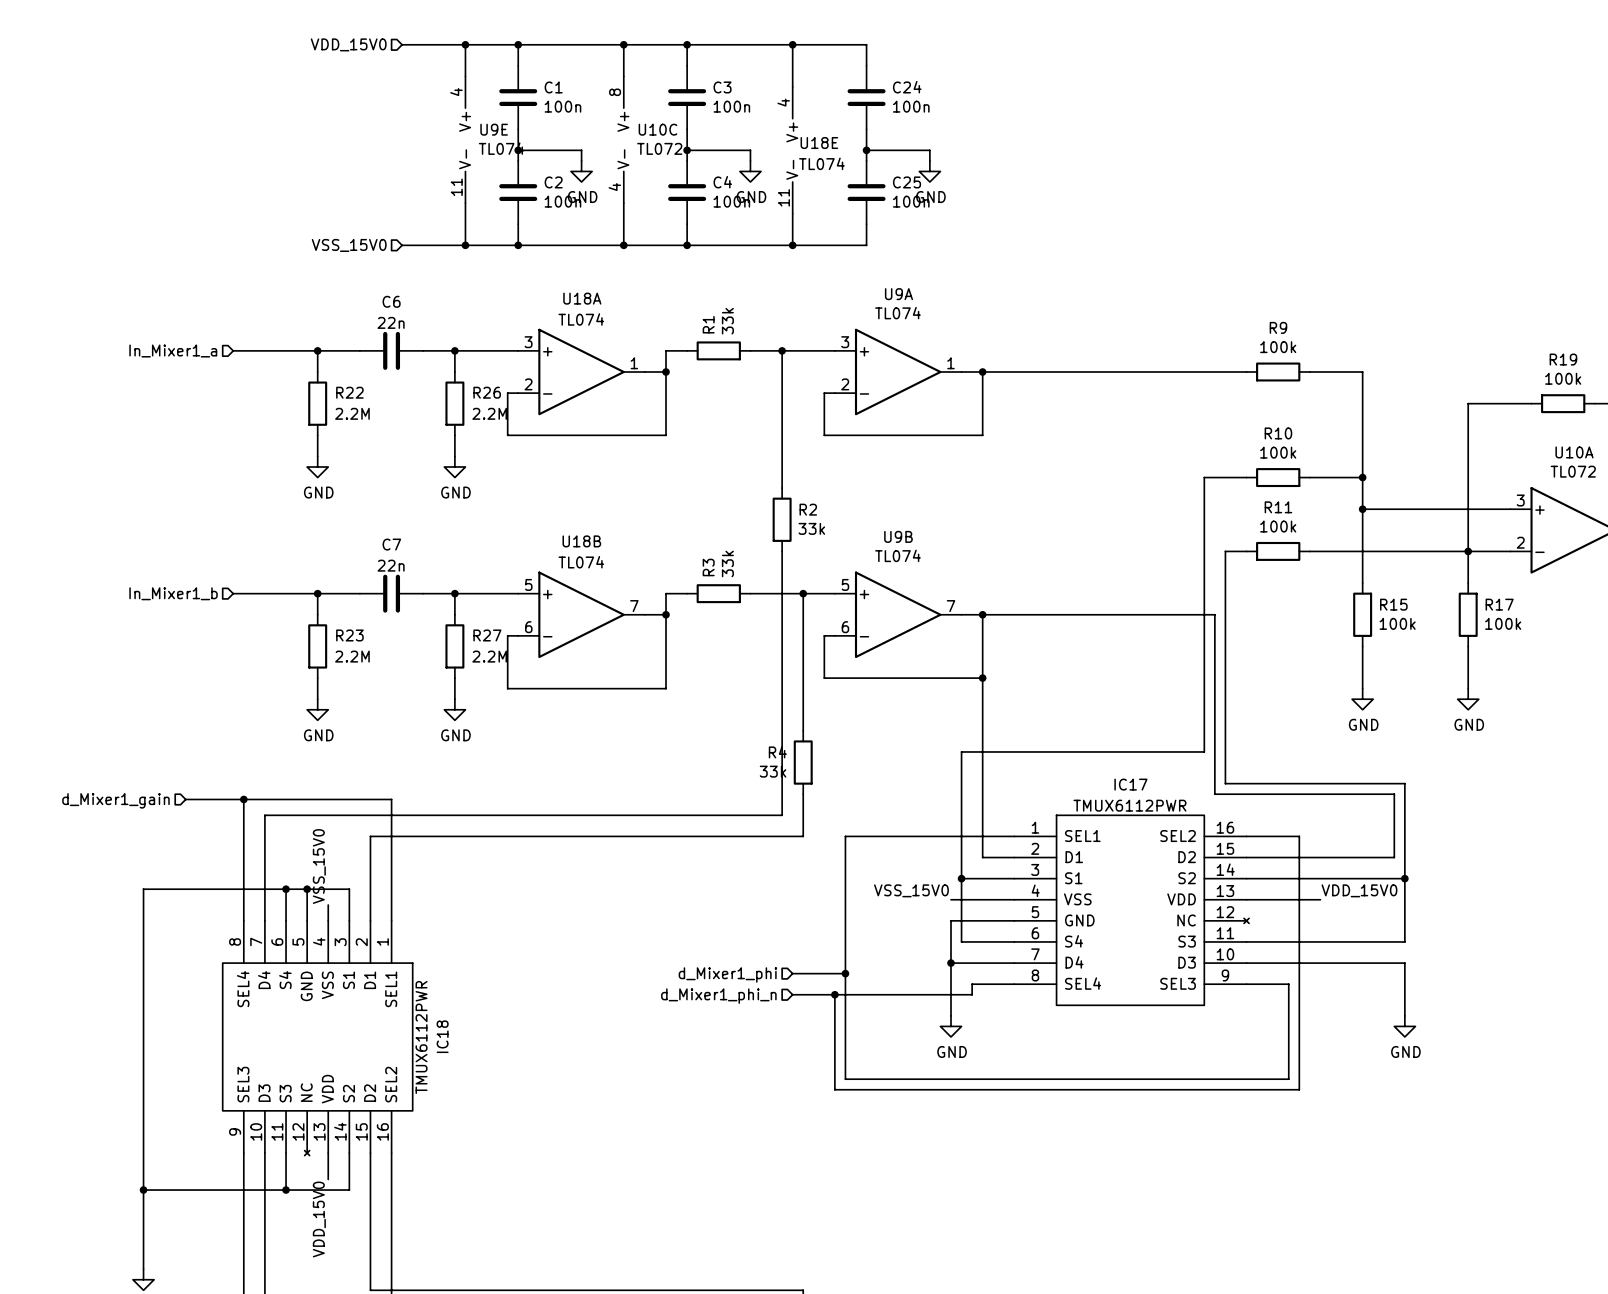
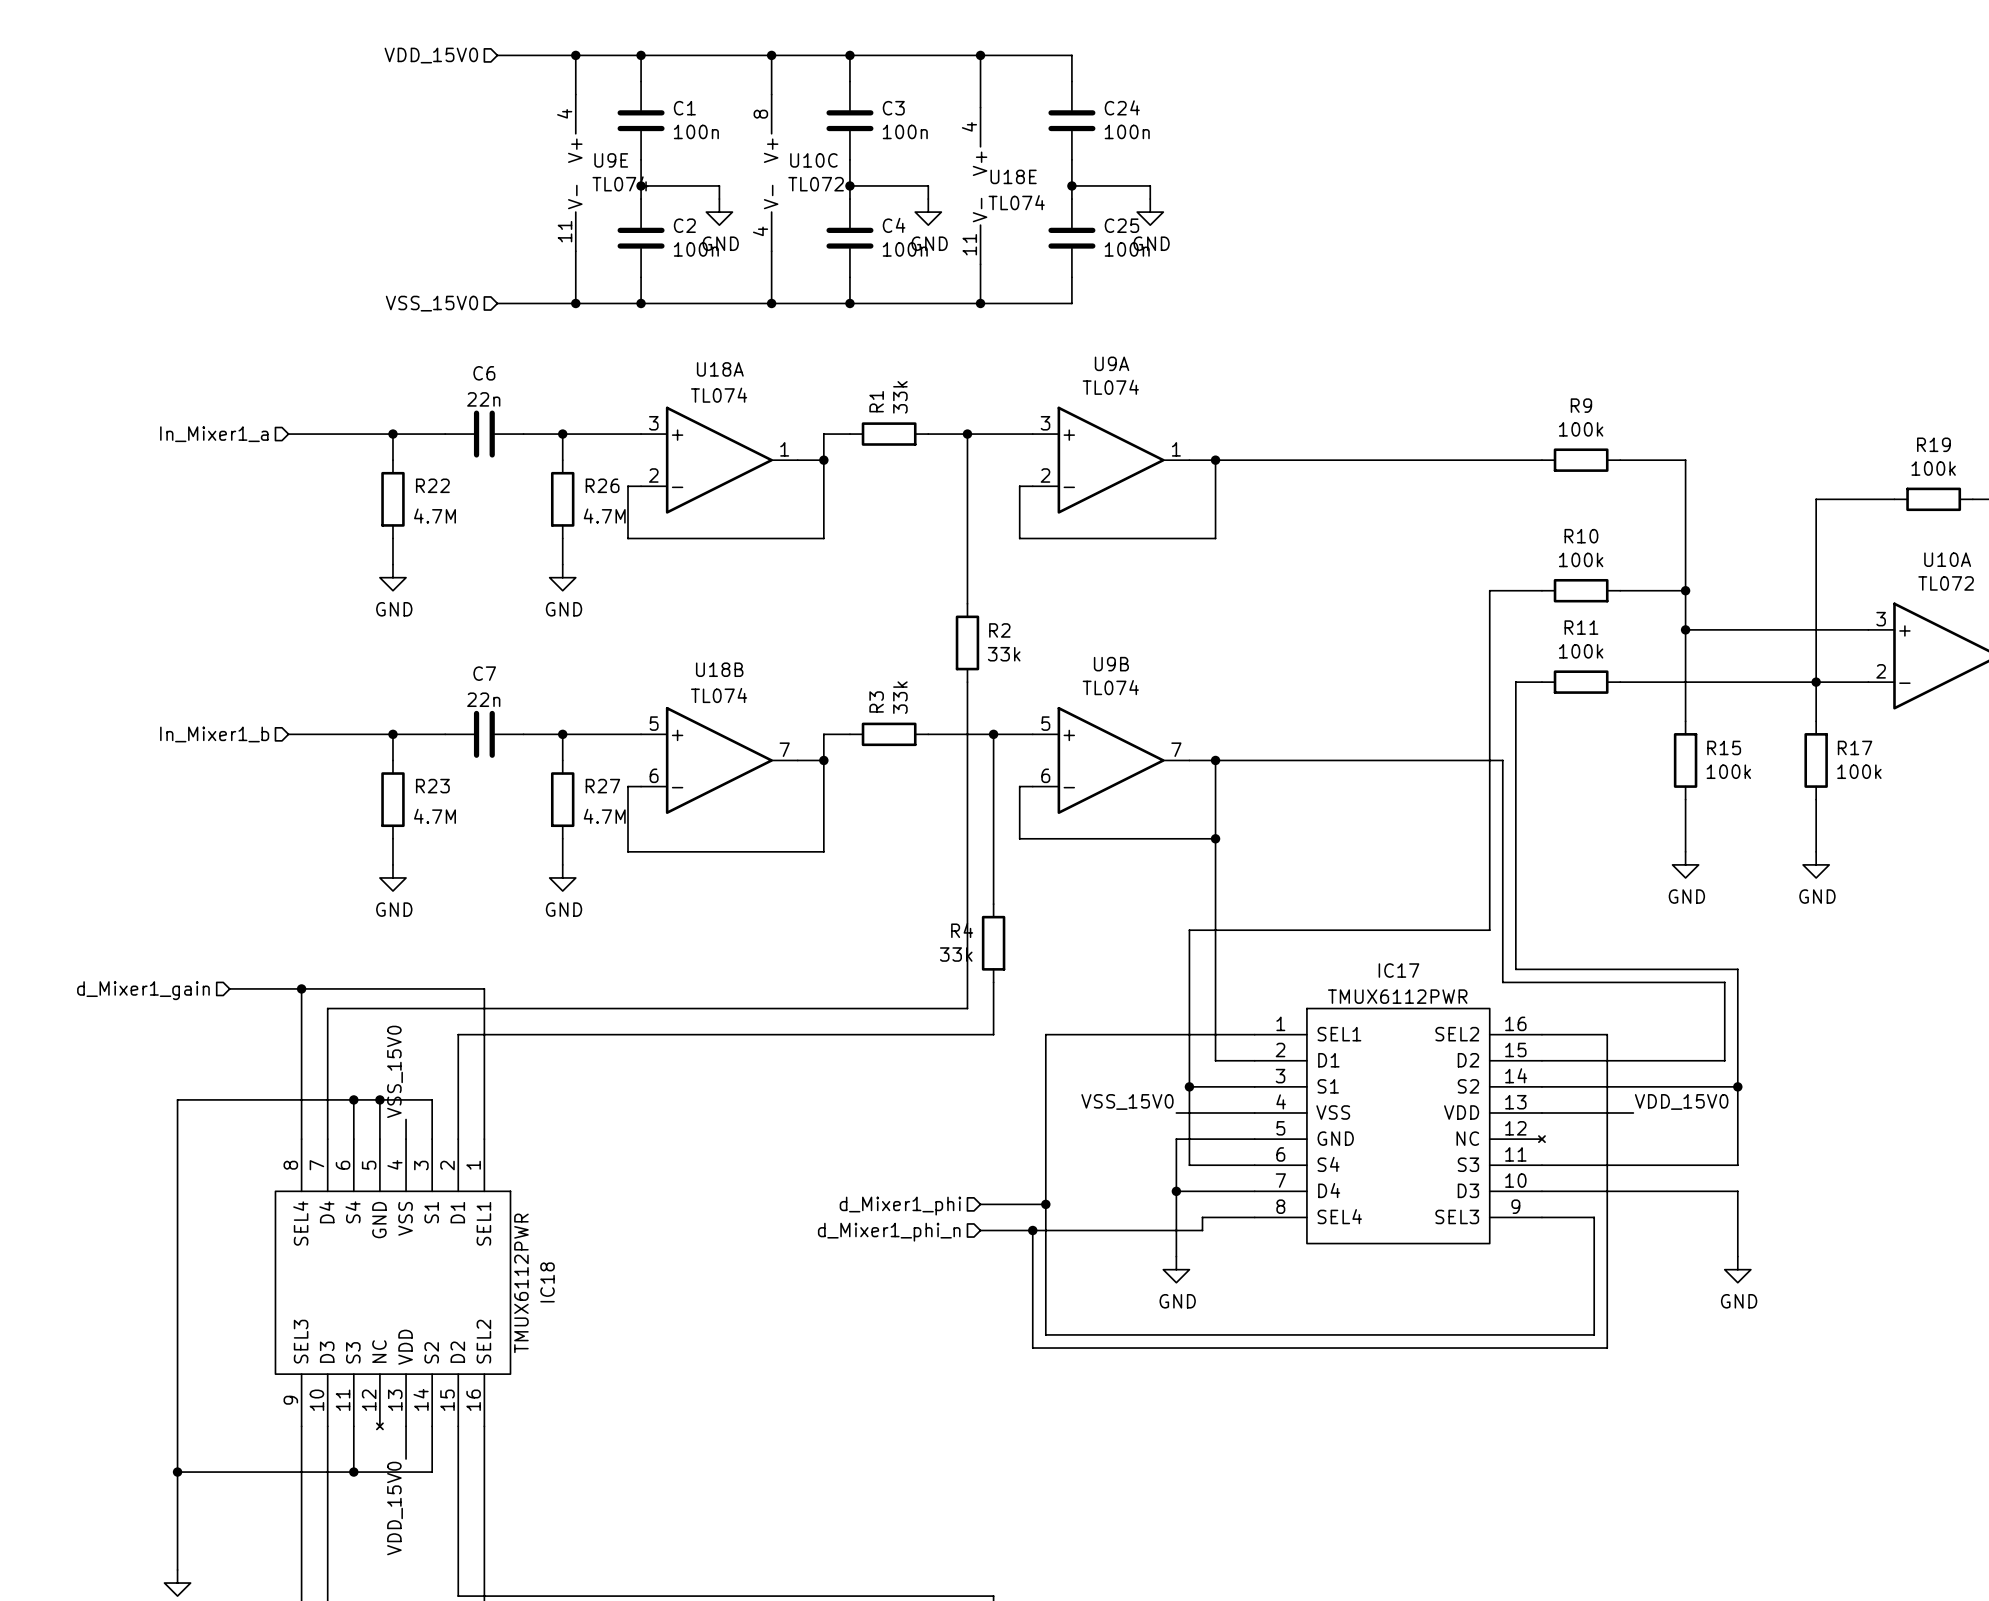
R22 value: 2.2M (352, 413) -> 4.7M (434, 516)
R26 value: 2.2M (489, 413) -> 4.7M (604, 516)
R23 value: 2.2M (352, 656) -> 4.7M (434, 816)
R27 value: 2.2M (489, 656) -> 4.7M (604, 816)

